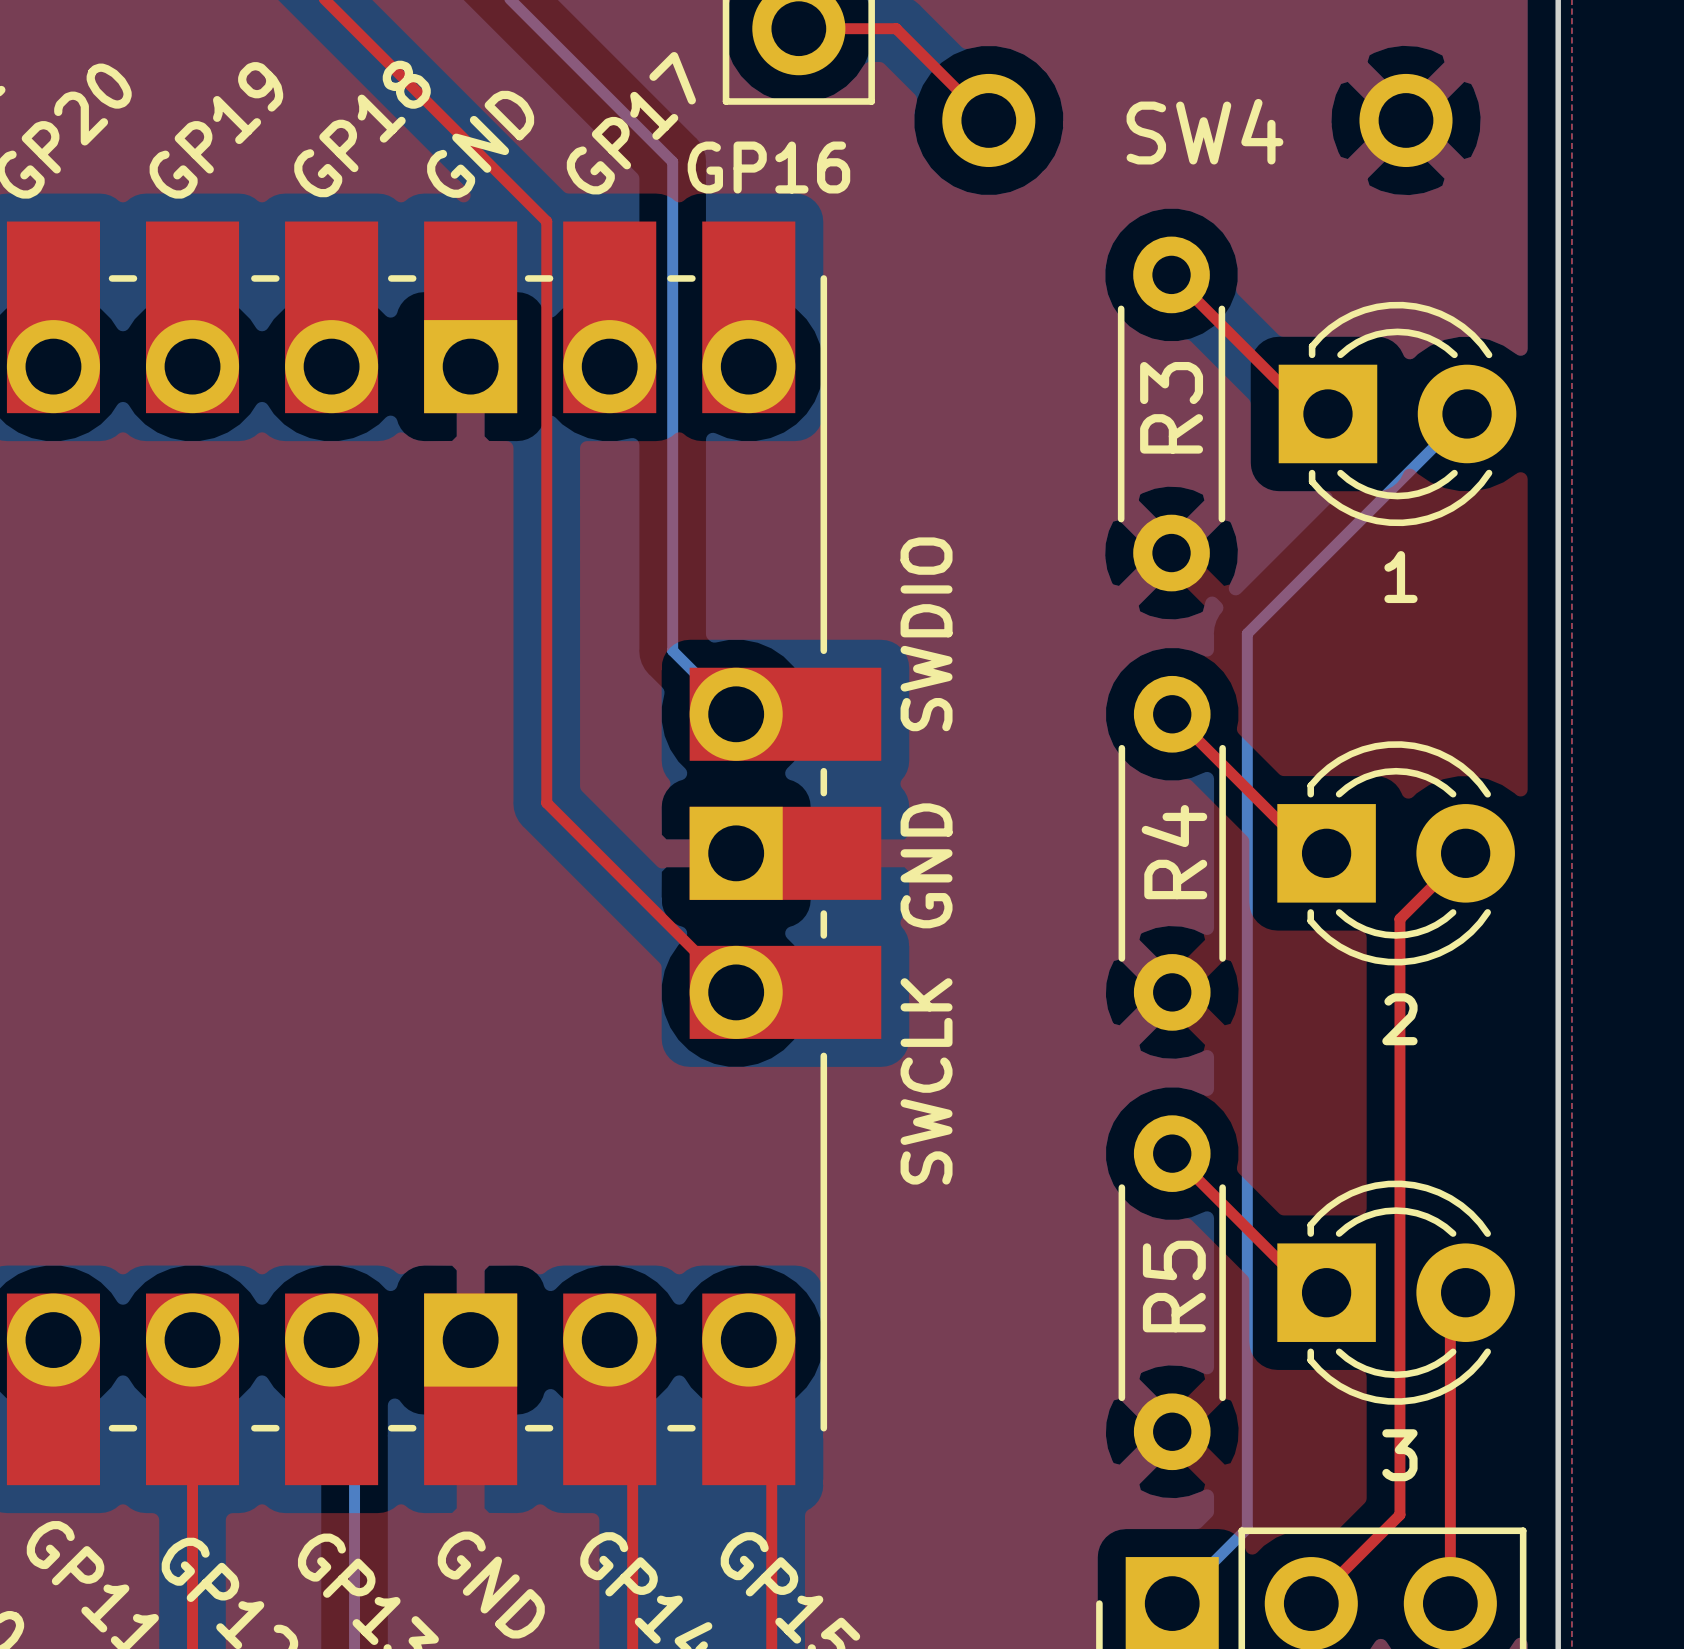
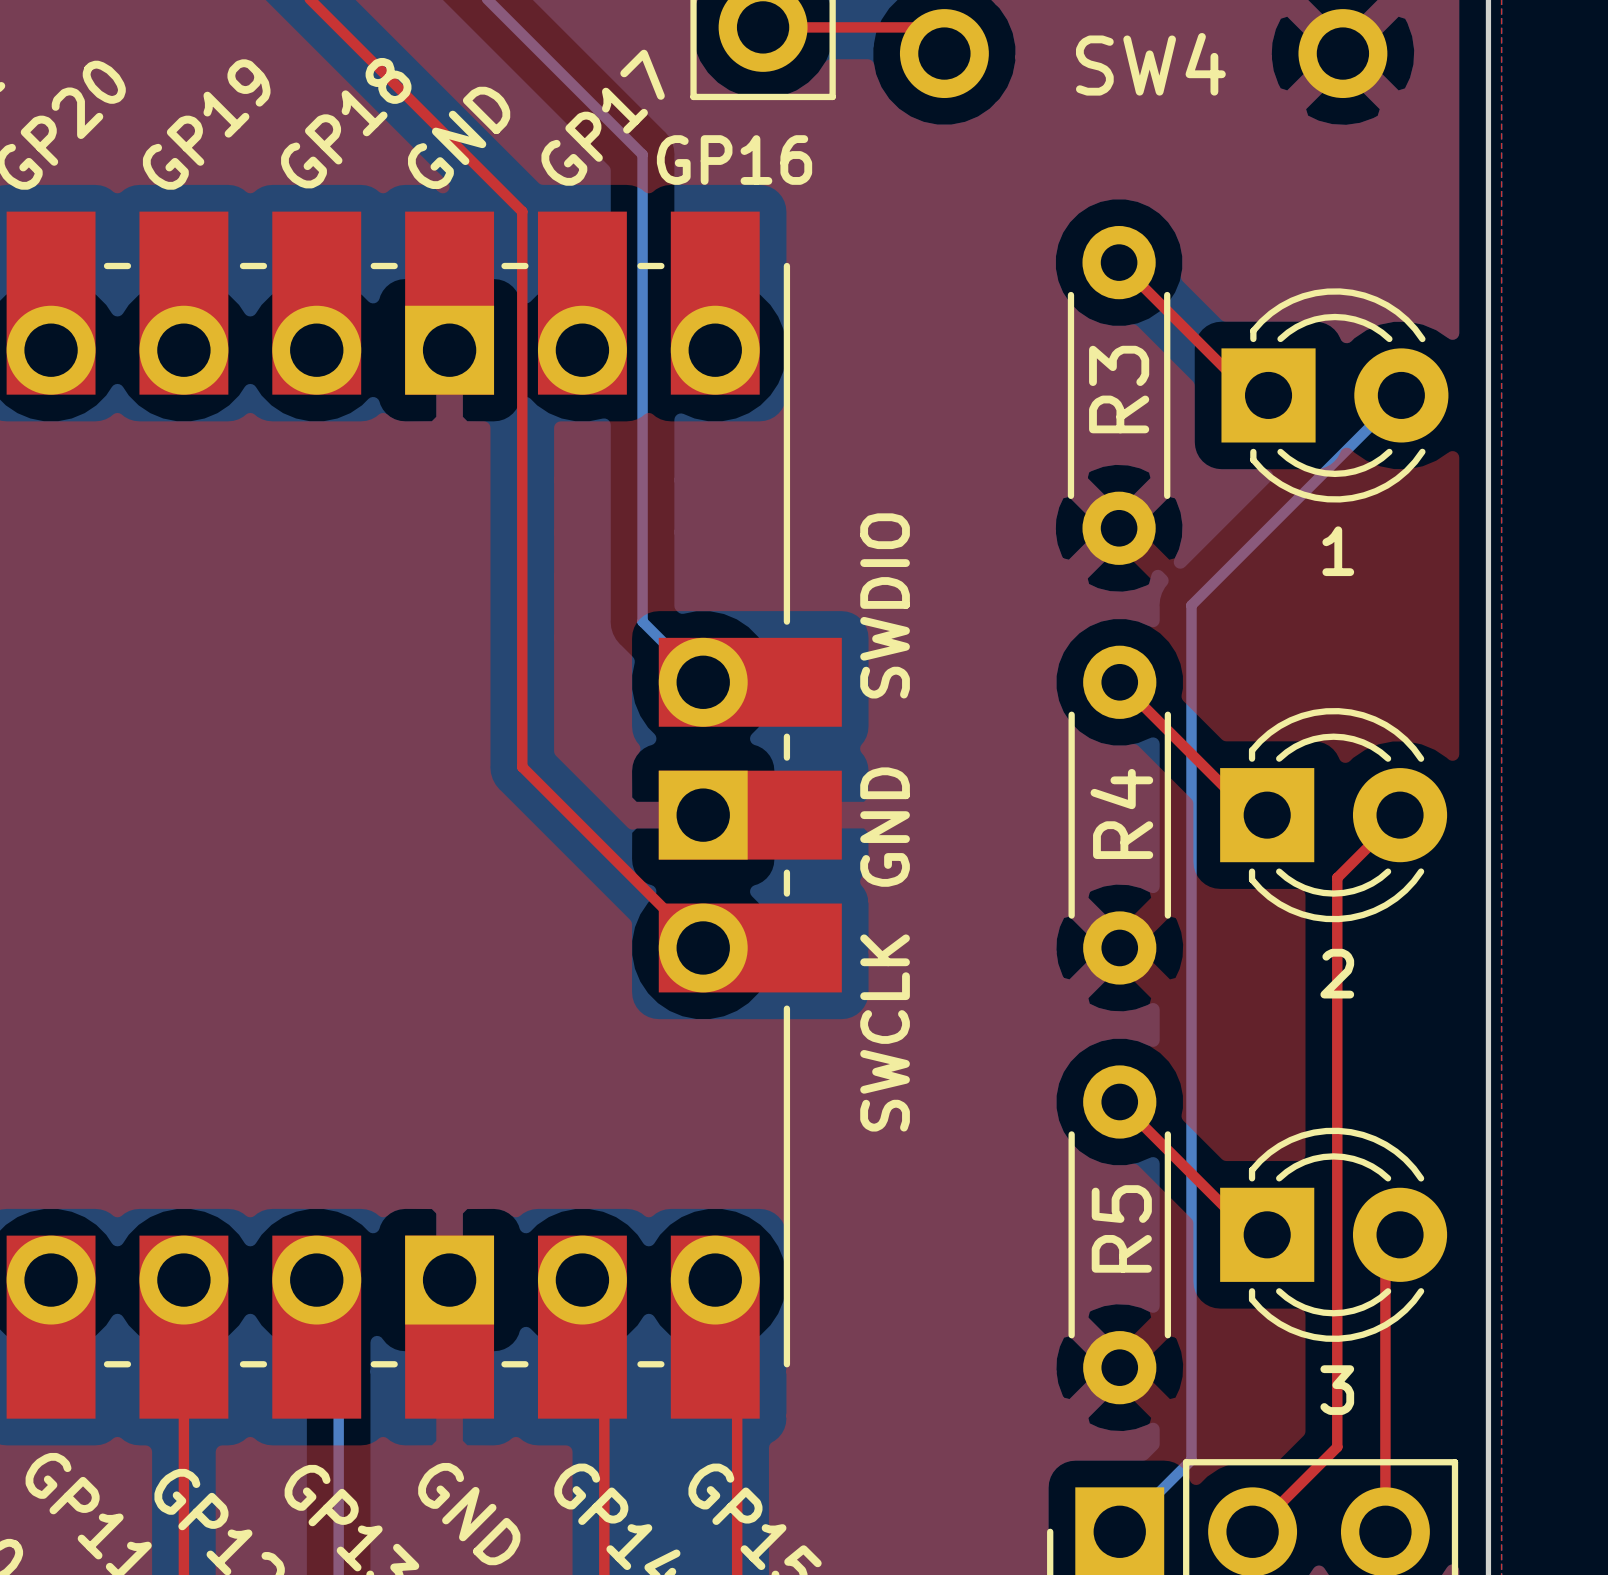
top track: (896, 28) (987, 120) -> (856, 27) (918, 27) (944, 53)
SW4 position: (1197, 120) -> (1143, 53)

